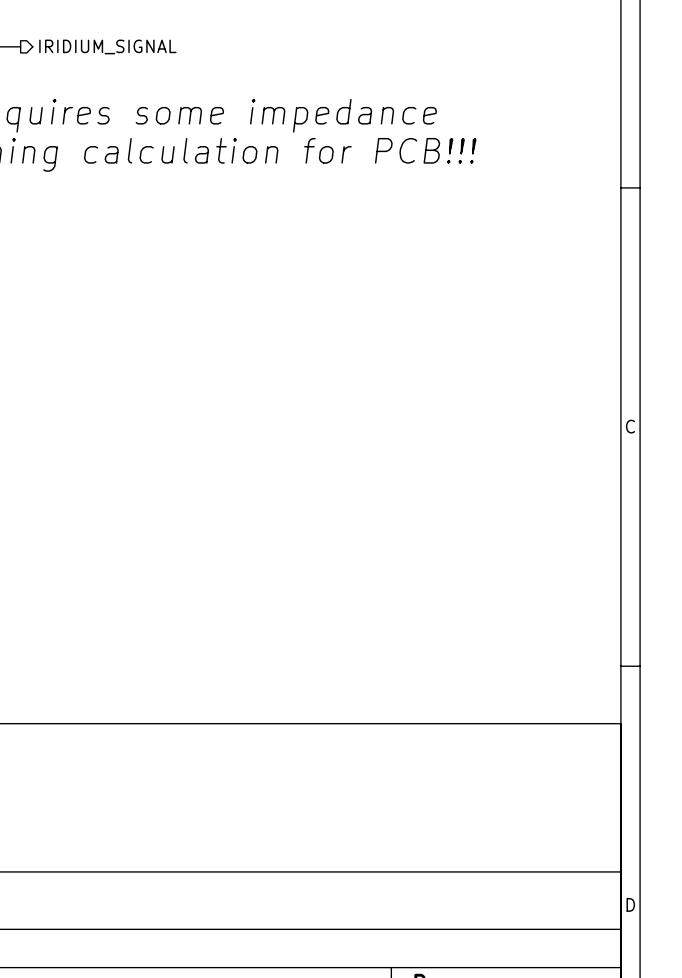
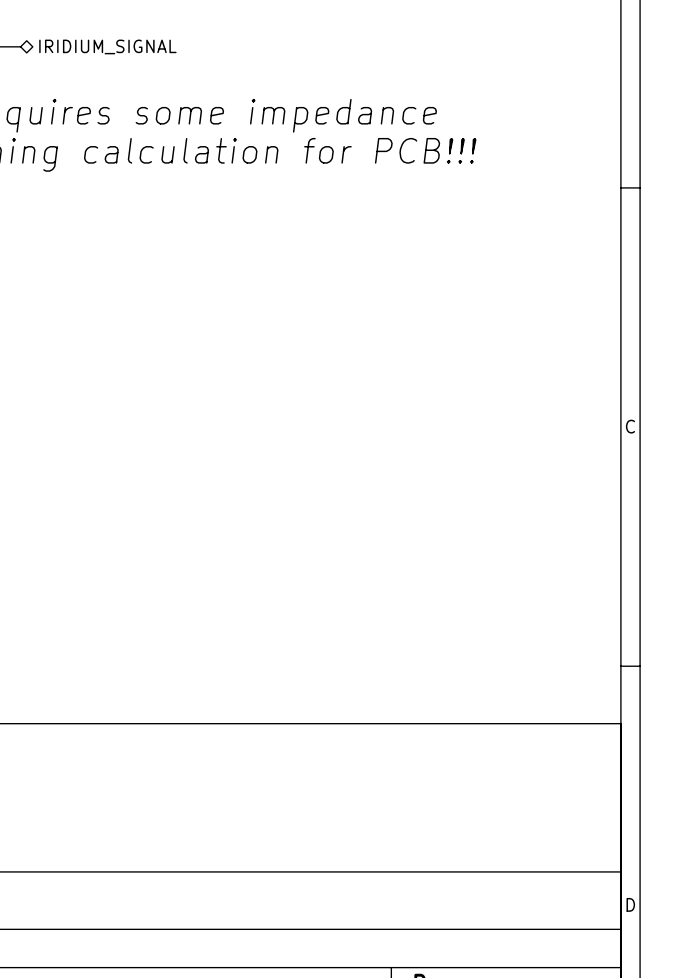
hierarchical label shape: output (107, 46) -> bidirectional (107, 46)

